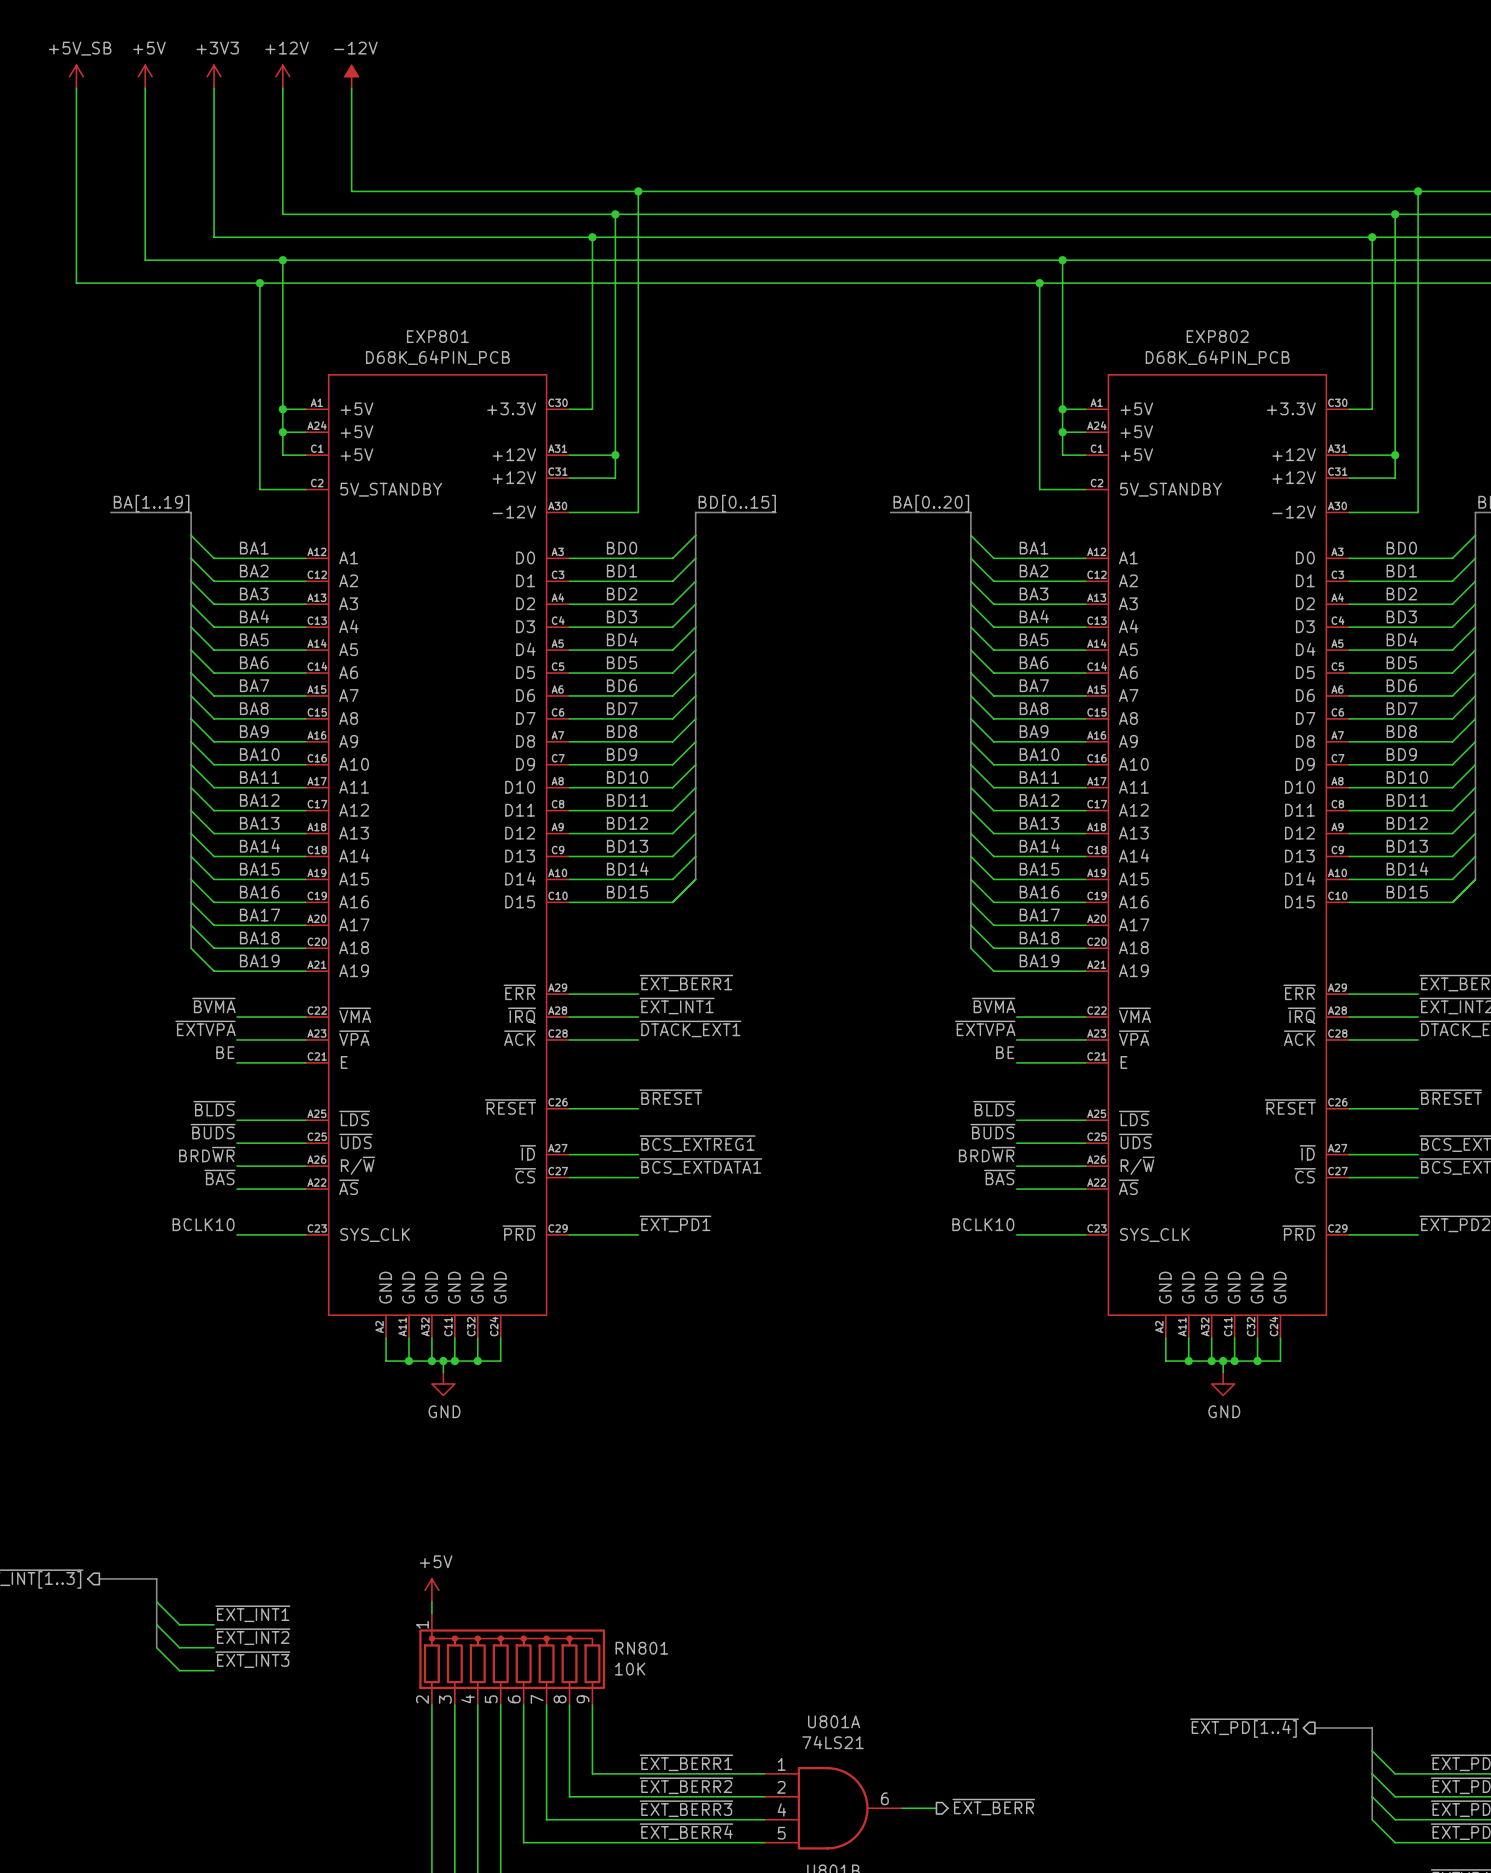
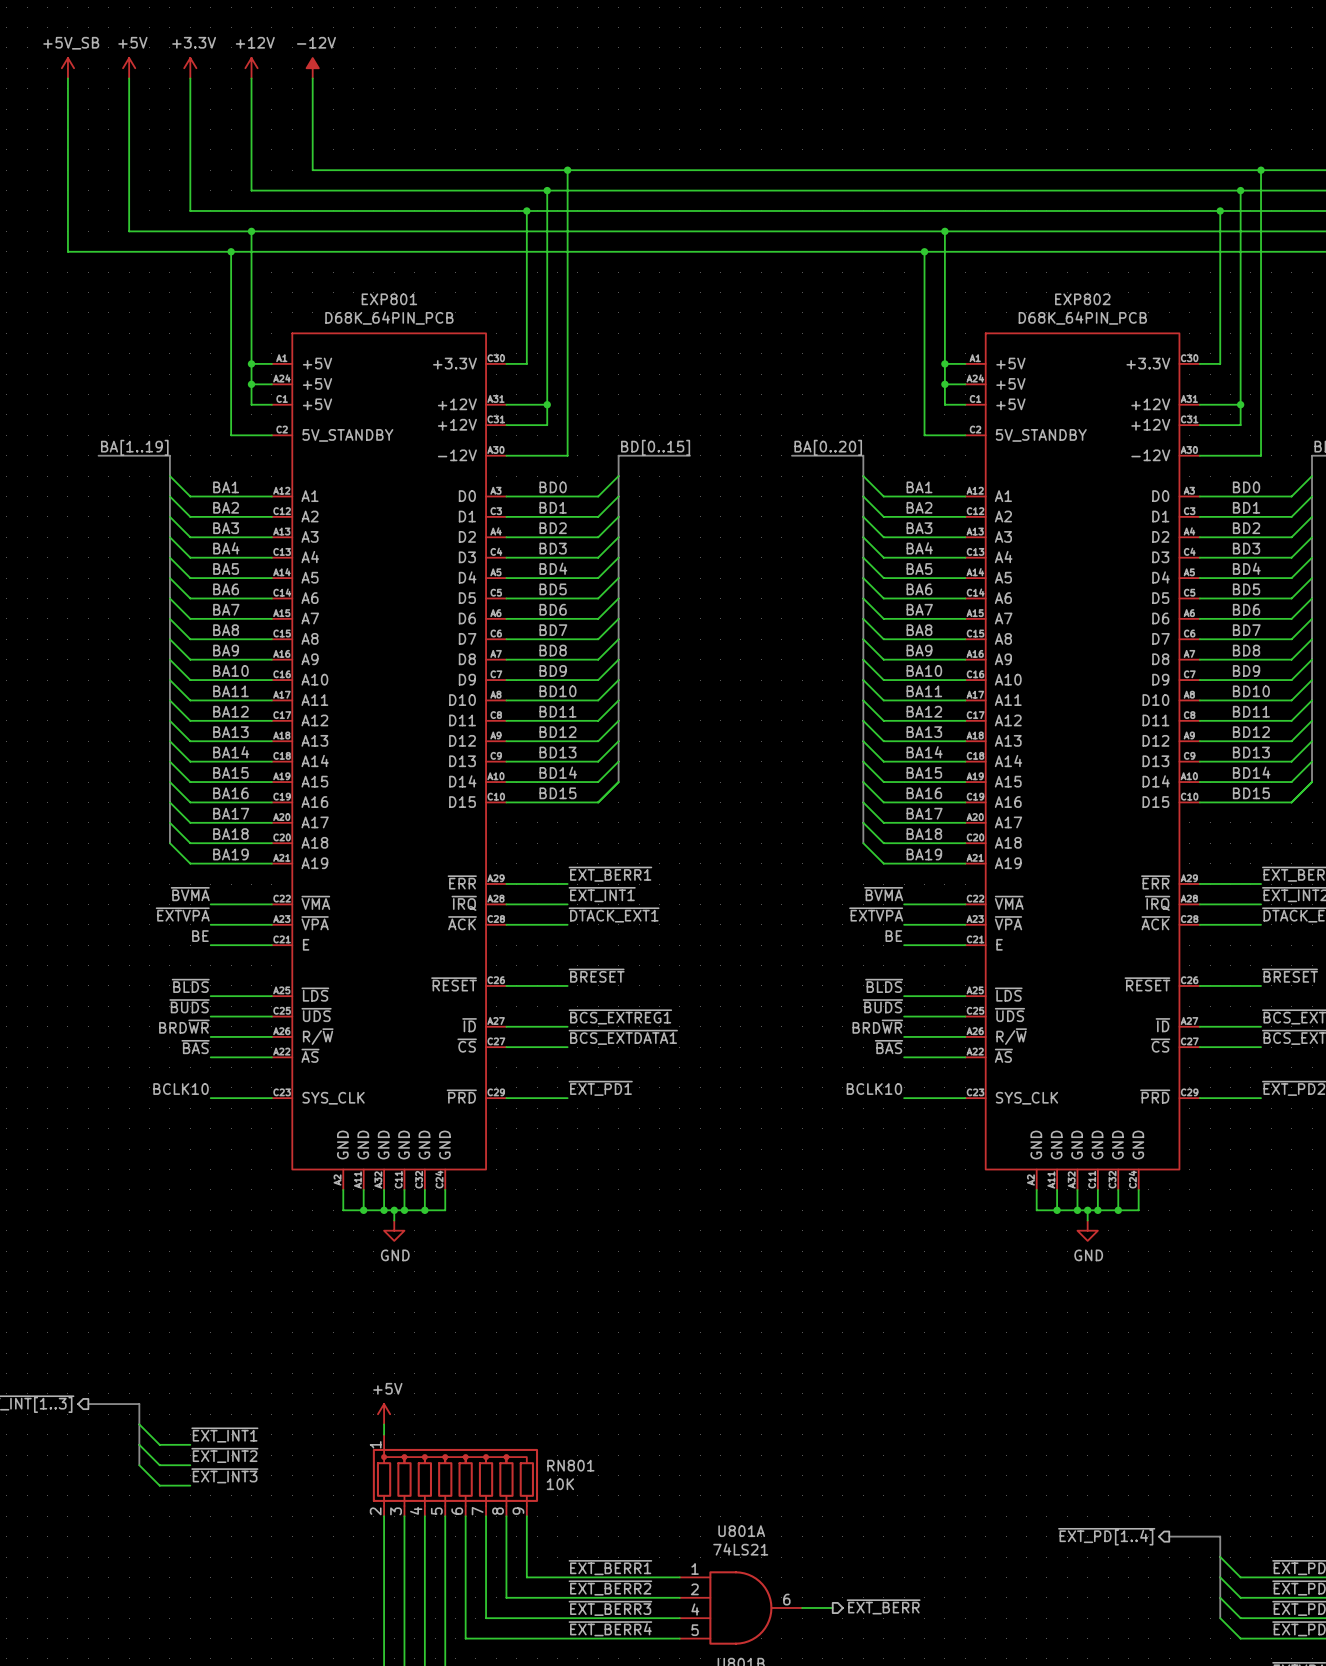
power symbol: +3V3 (214, 76) -> +3.3V (190, 68)

